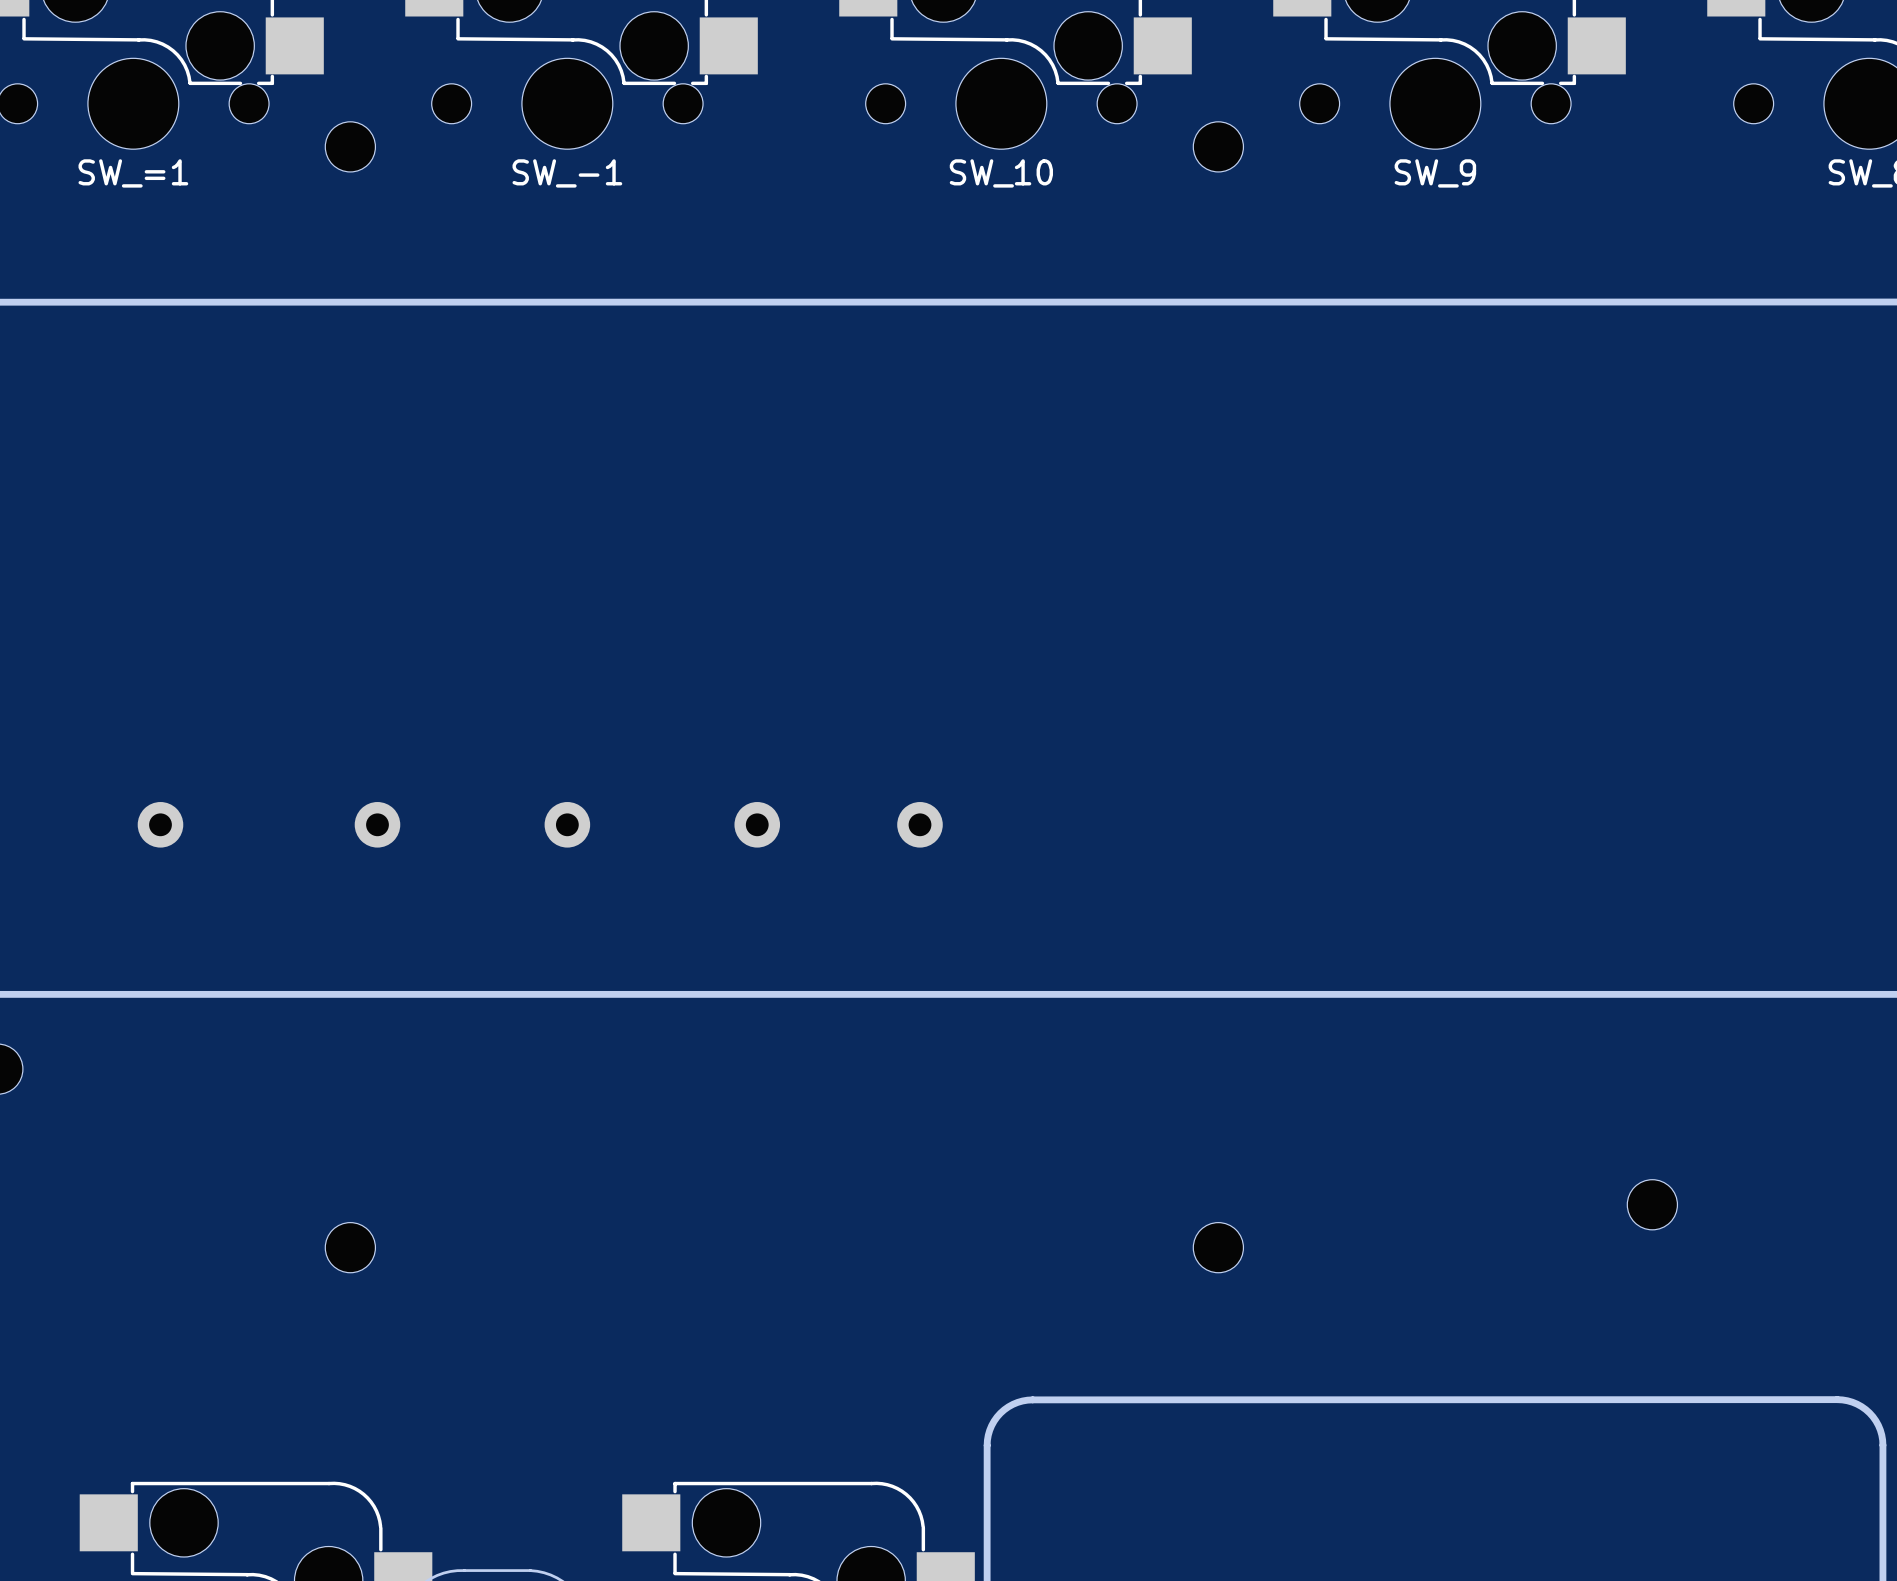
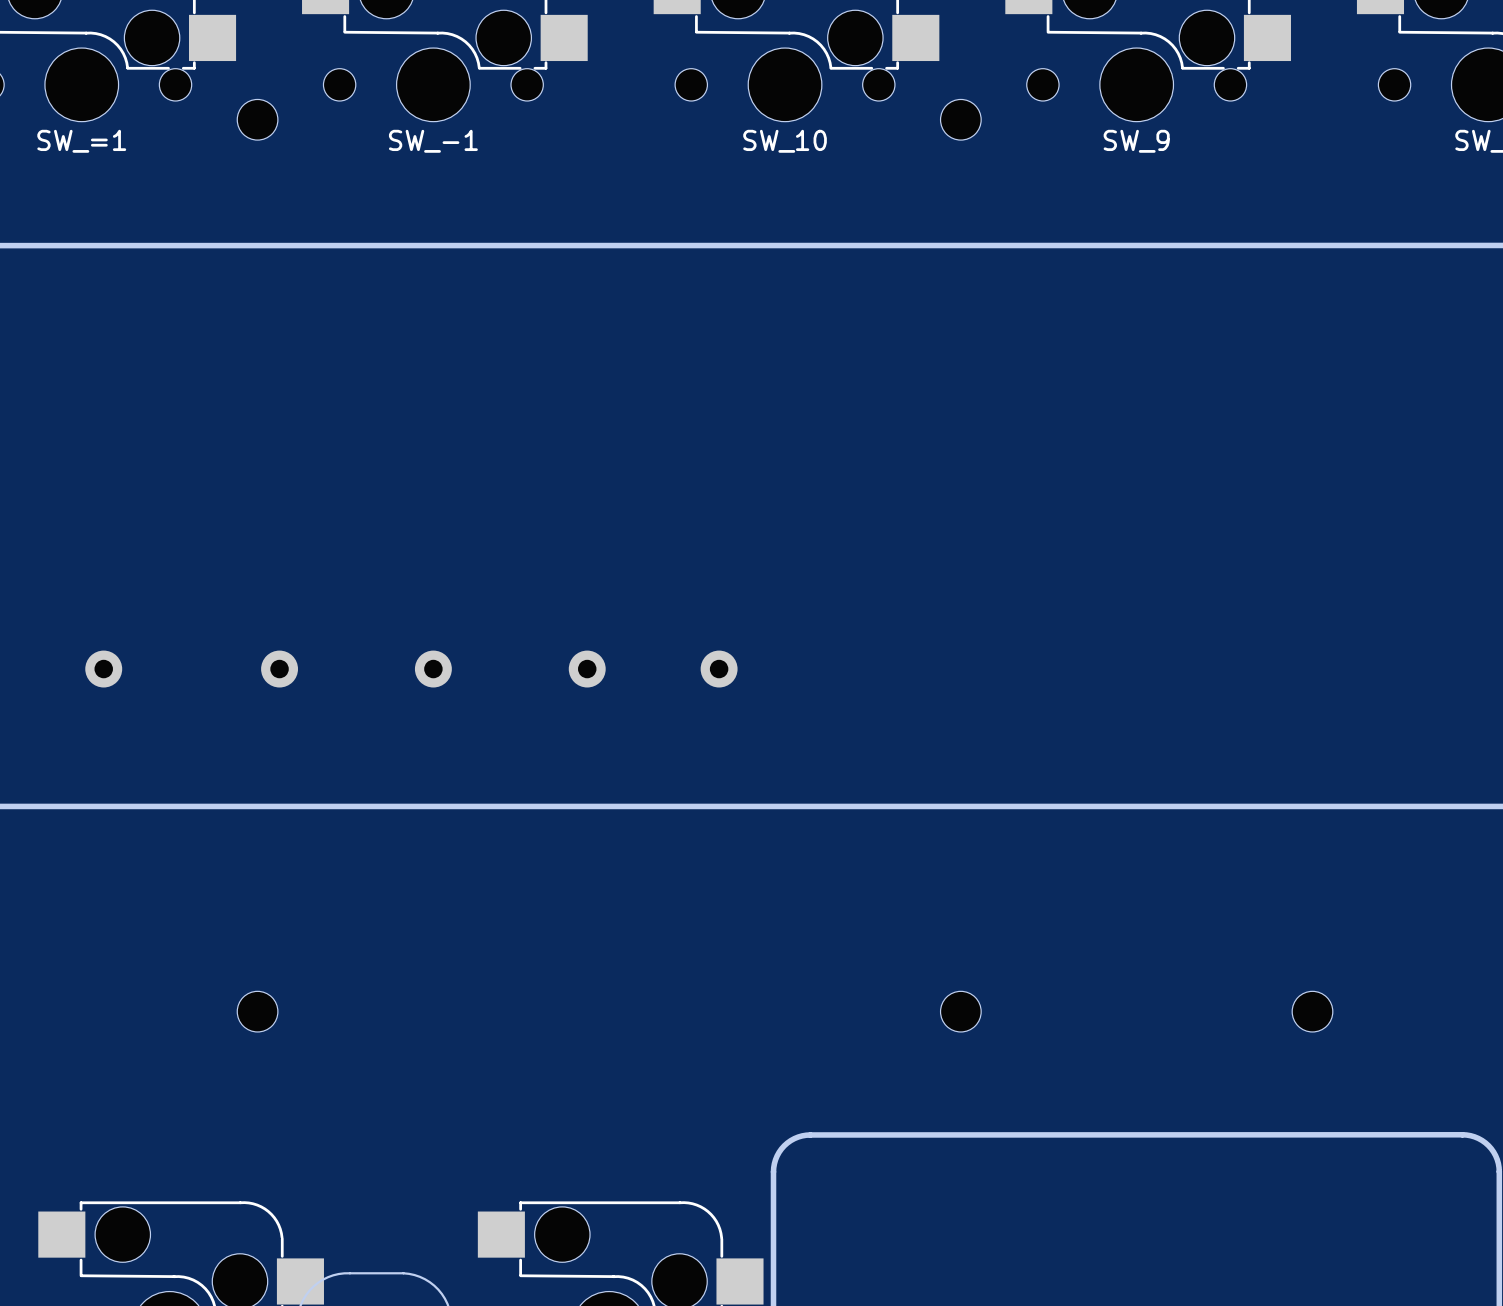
part position: (1652, 1204) -> (1312, 1011)

